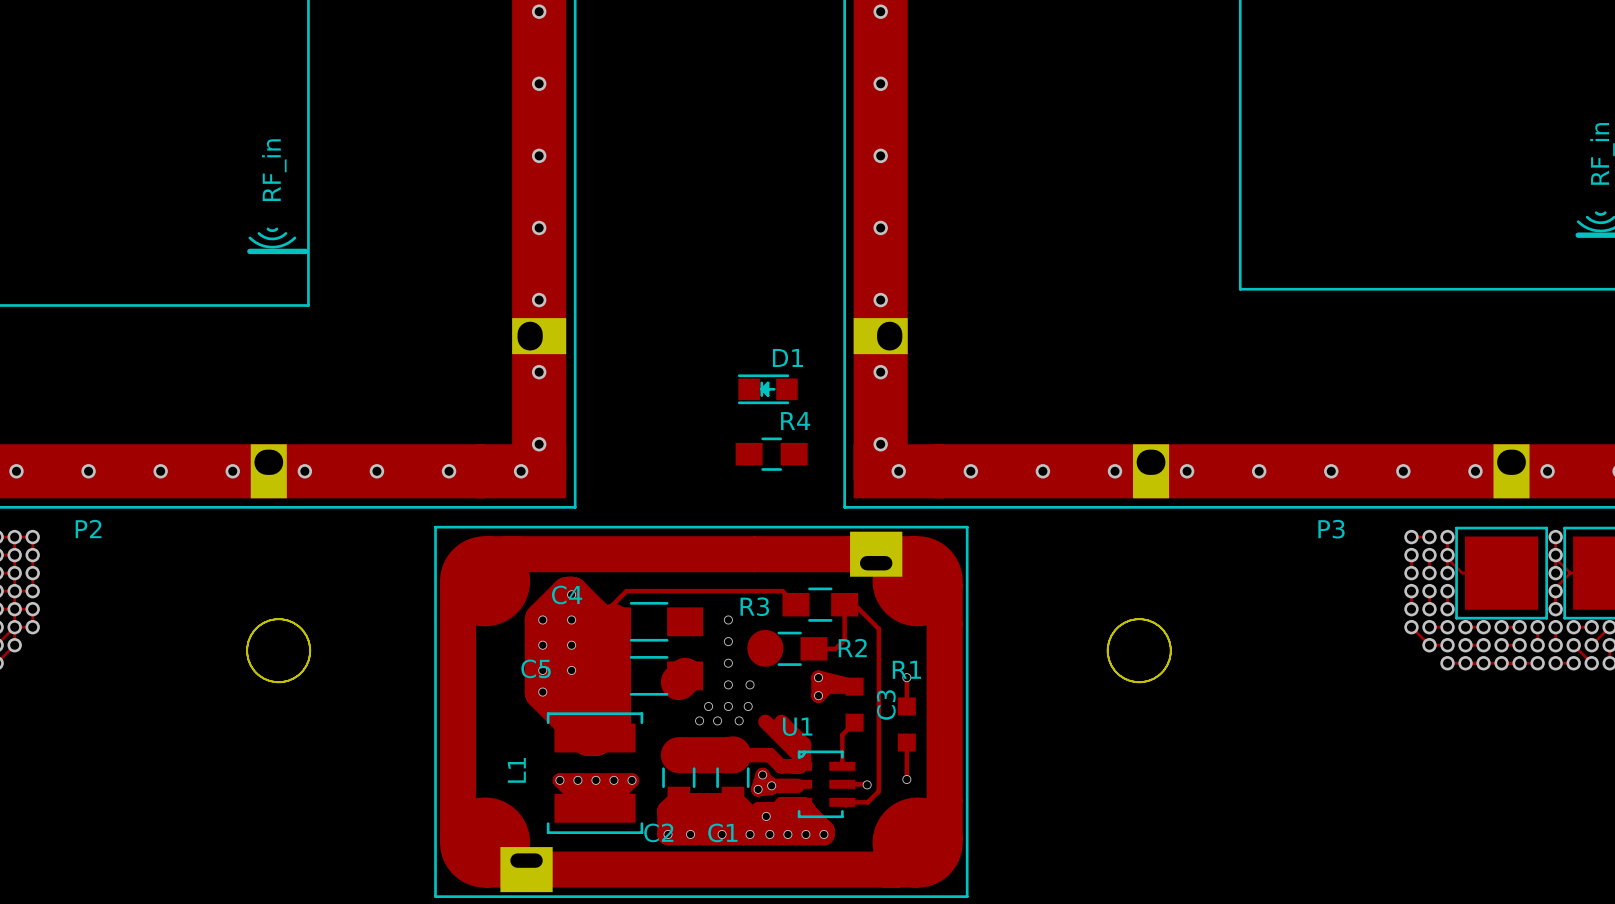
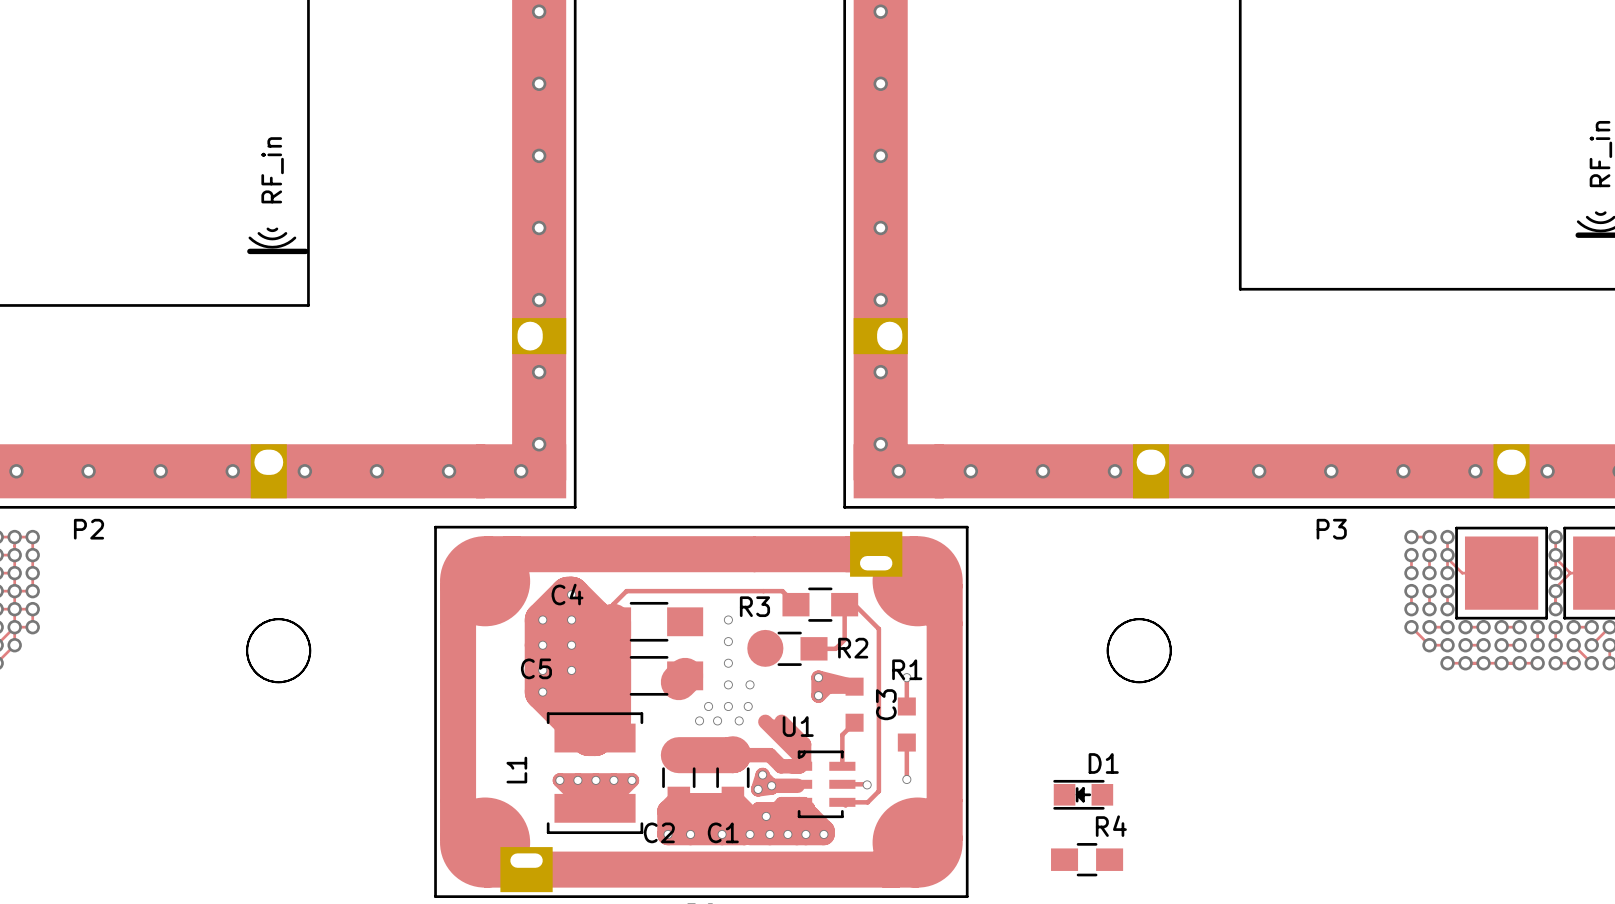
D1 position: (767, 389) -> (1083, 794)
R4 position: (771, 454) -> (1087, 859)

